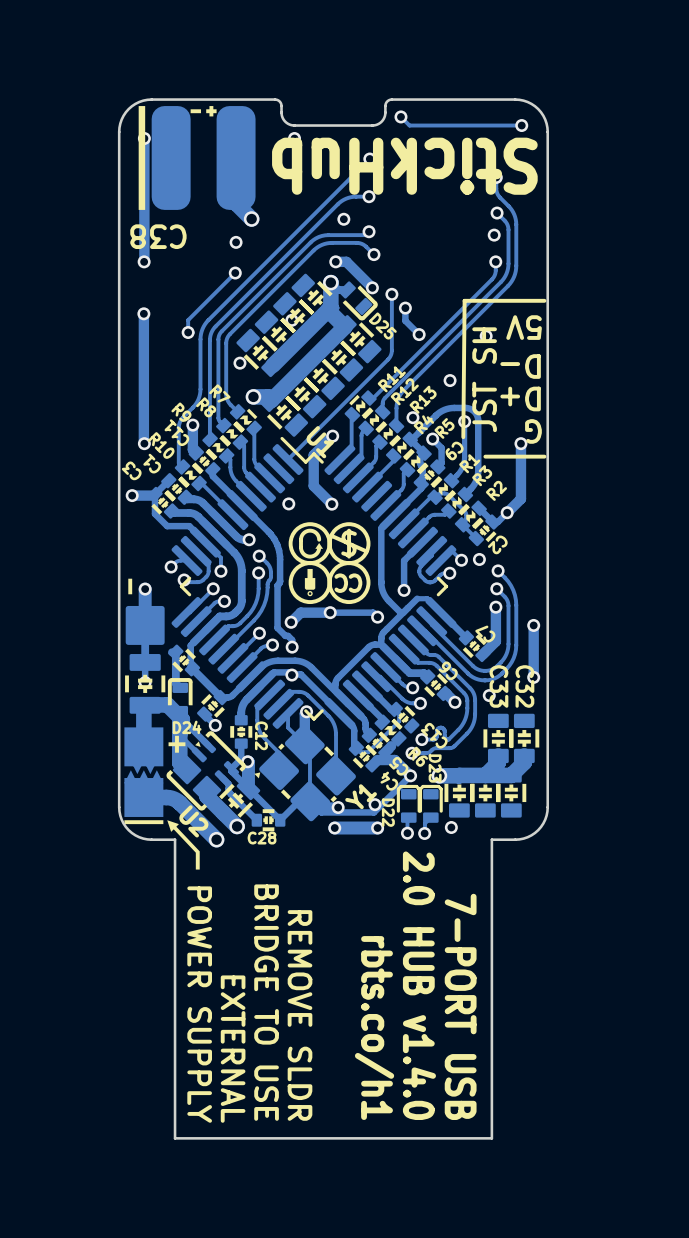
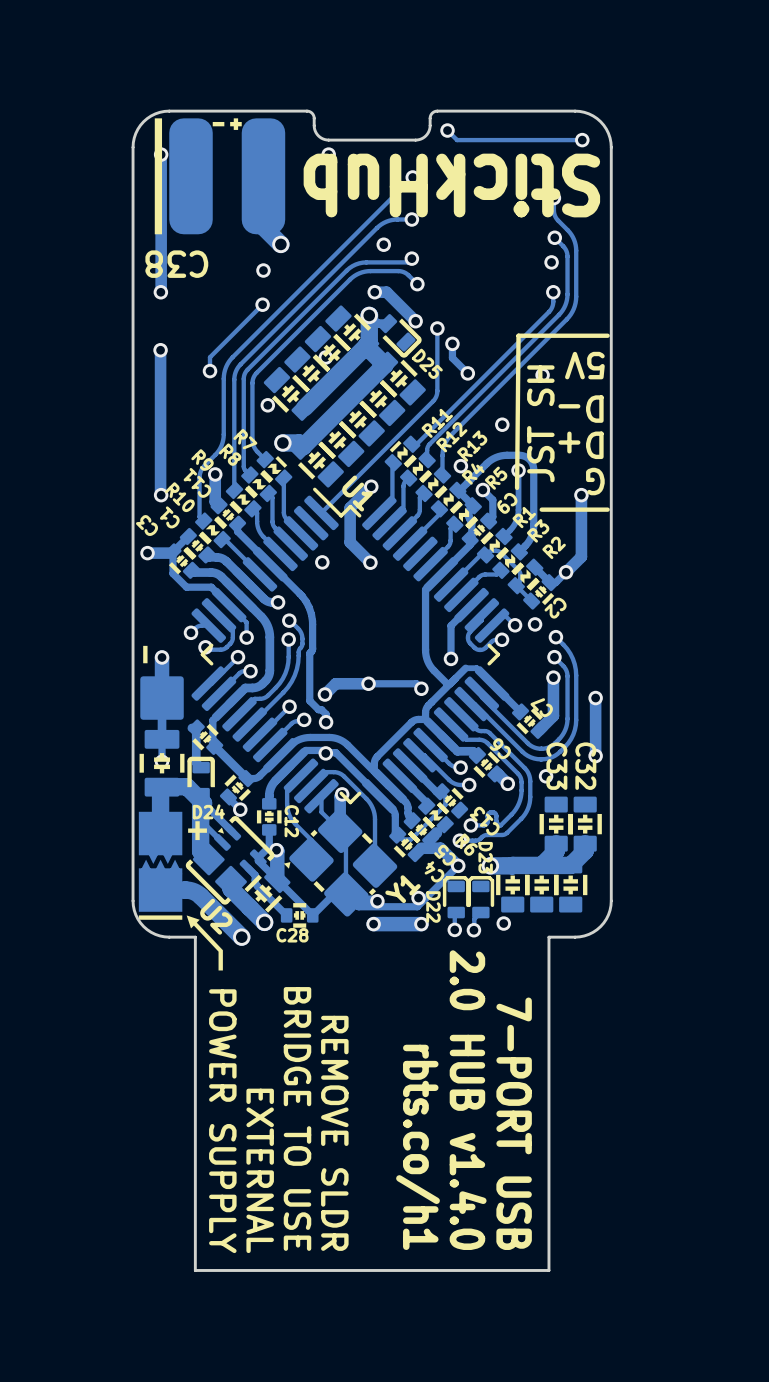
drawing: [288, 522, 371, 605] -> none

